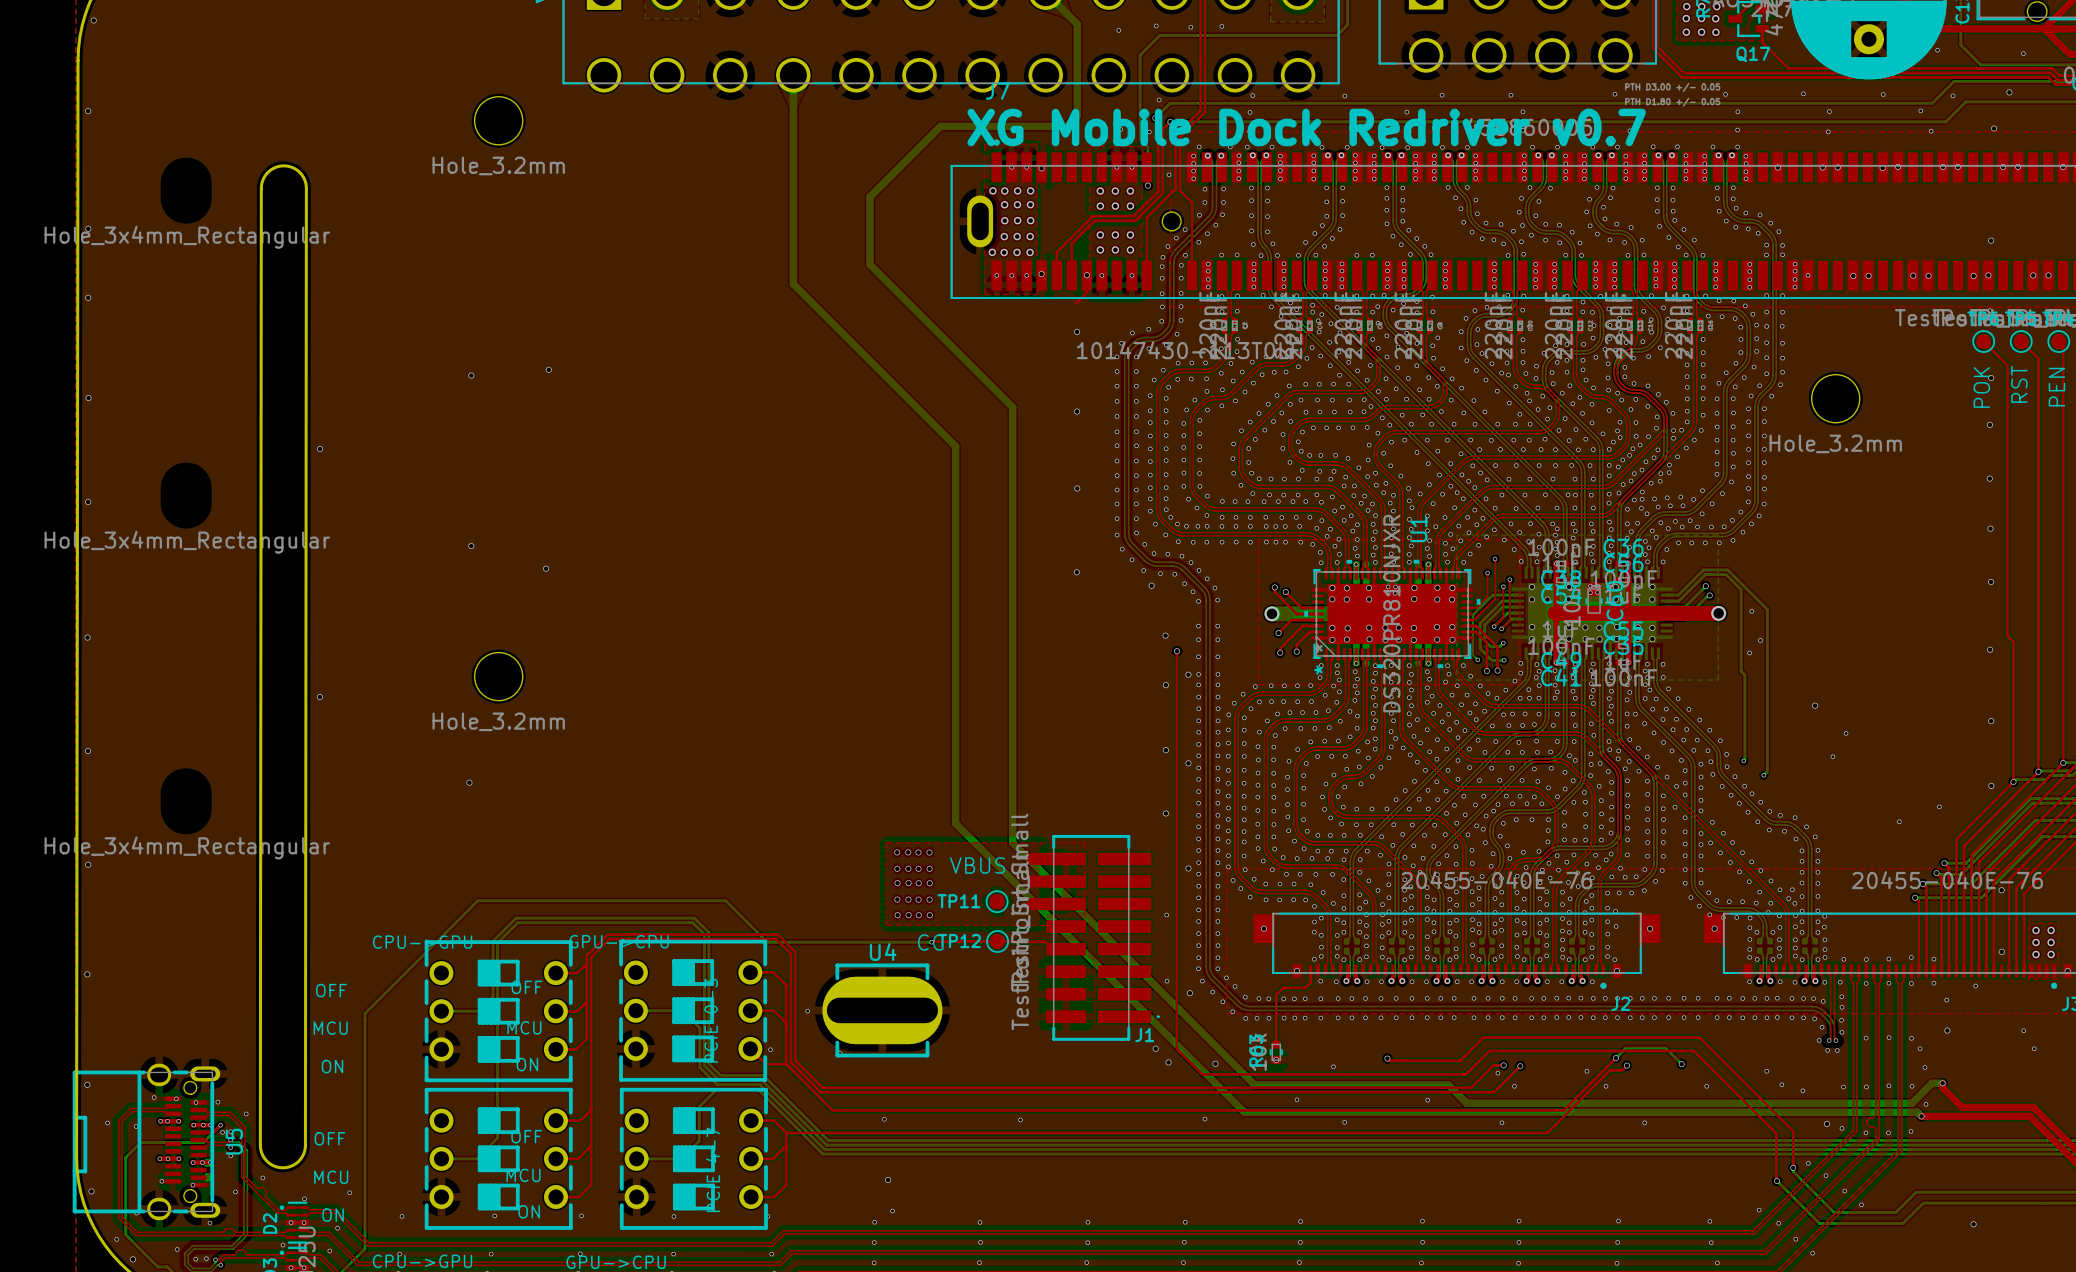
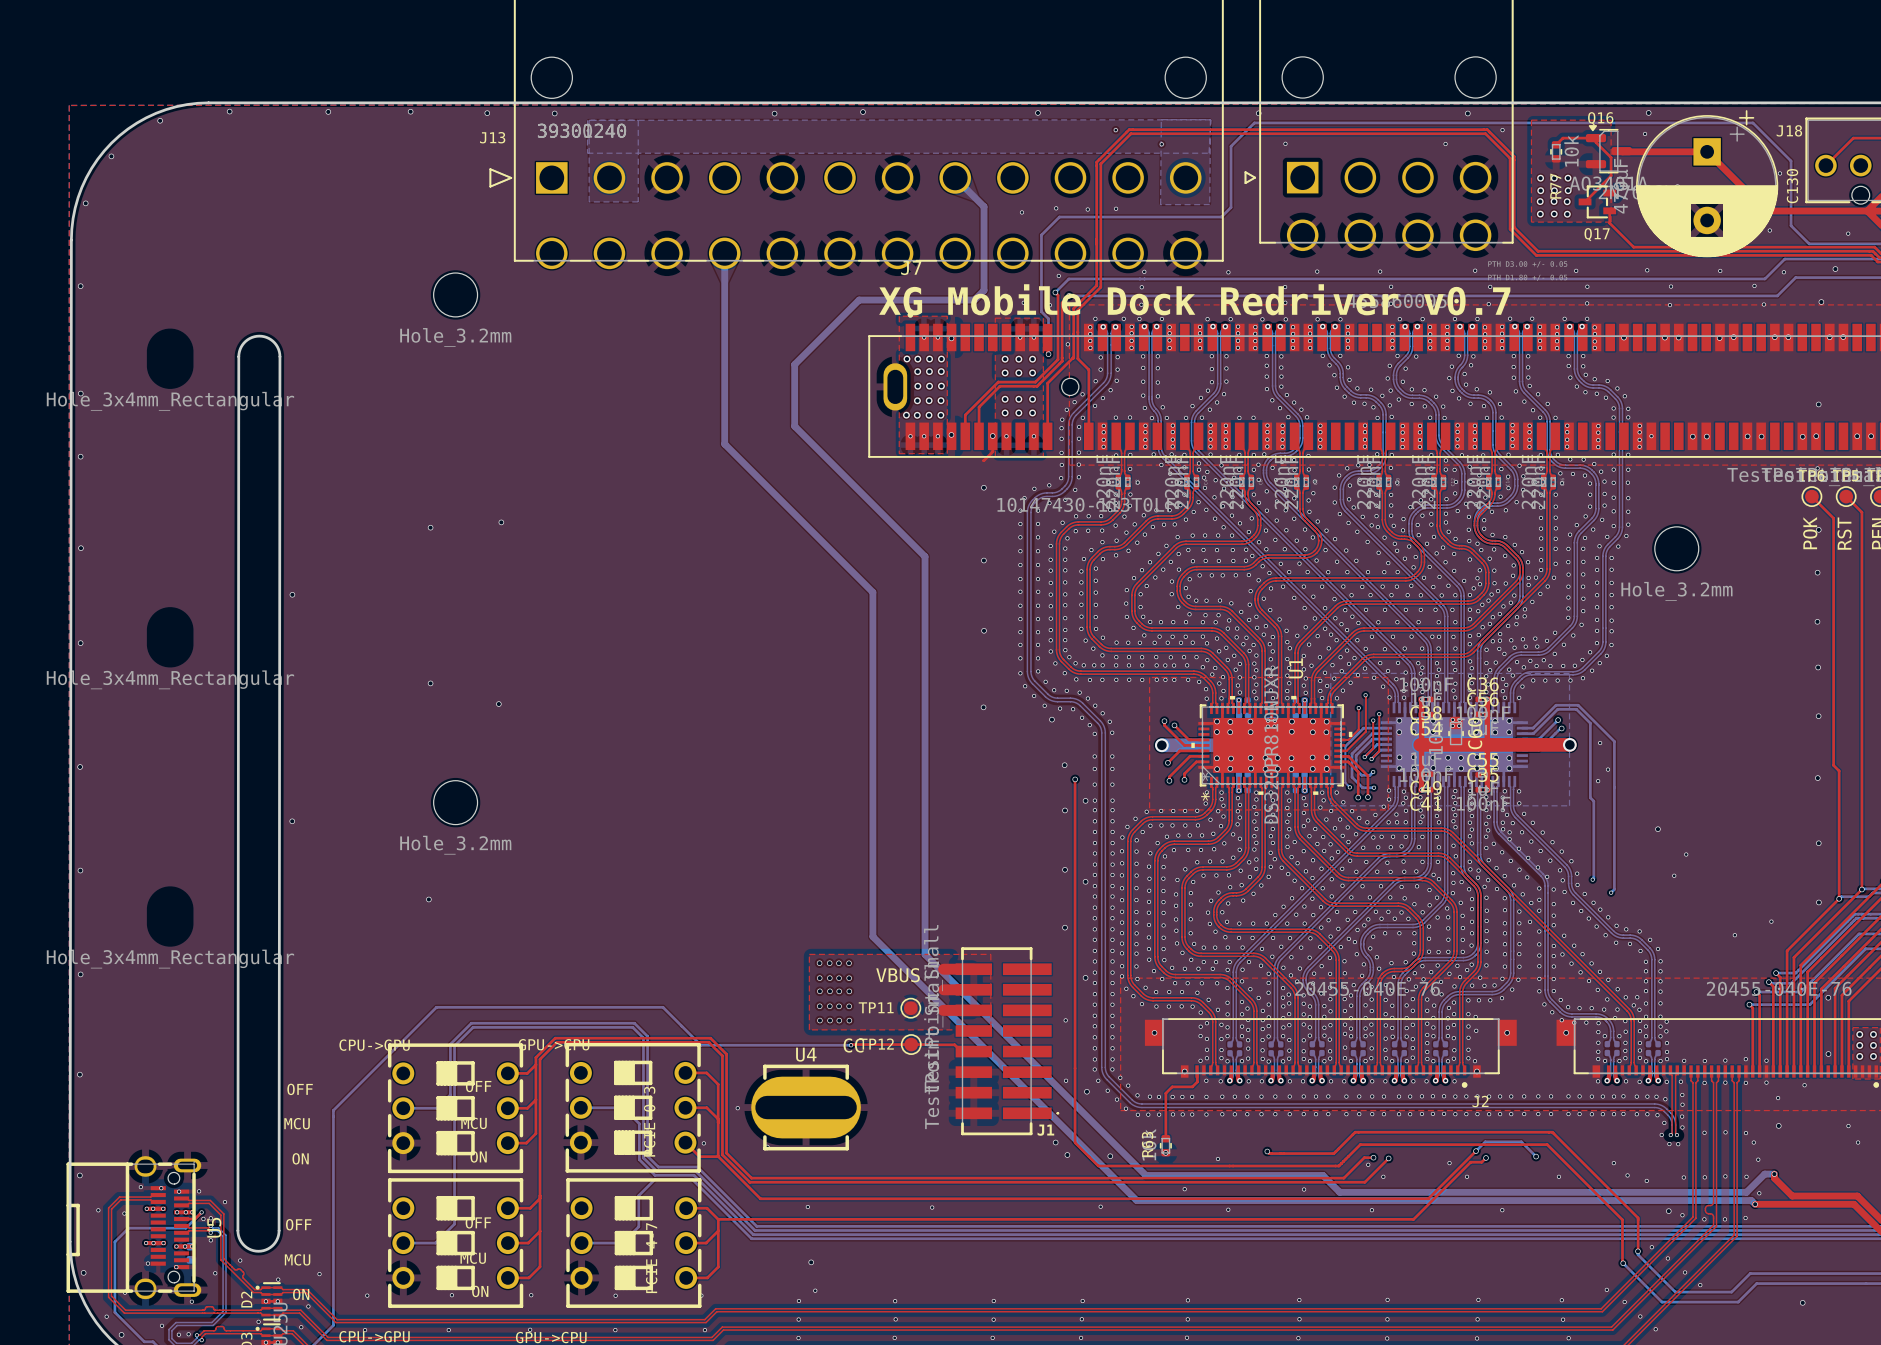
via: none -> (1503, 829)
via: none -> (1488, 830)
via: (1635, 714) -> none
via: none -> (1509, 839)
via: (1662, 719) -> none
via: none -> (1493, 843)
via: (1644, 723) -> none
via: none -> (1518, 848)
via: (1673, 729) -> none
via: none -> (1502, 852)
via: (1654, 732) -> none
via: none -> (1528, 857)
via: none -> (1510, 860)
via: (1683, 740) -> none
via: (1663, 742) -> none
via: none -> (1537, 867)
via: none -> (1519, 869)
via: (1672, 750) -> none
via: (1693, 750) -> none
via: none -> (1547, 876)
via: none -> (1527, 877)
via: (1681, 760) -> none
via: (1700, 764) -> none
via: none -> (1553, 889)
via: (1701, 777) -> none

